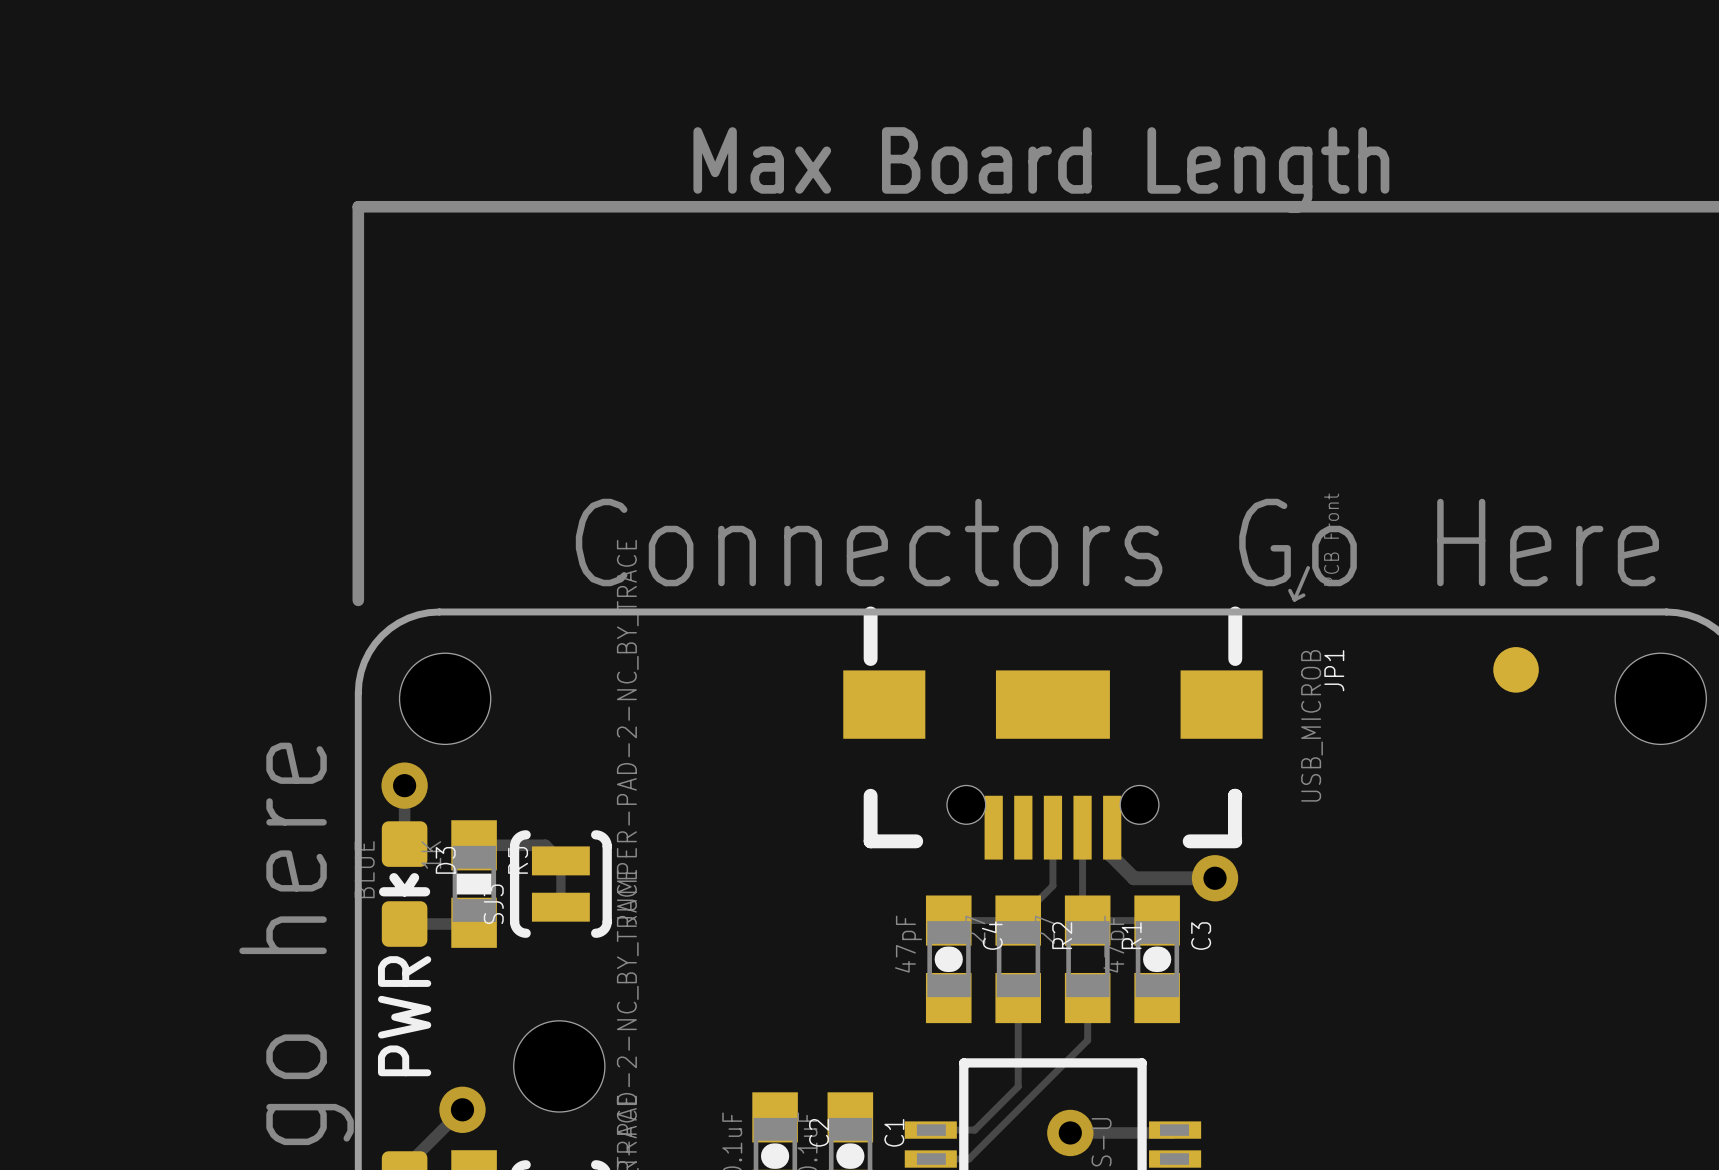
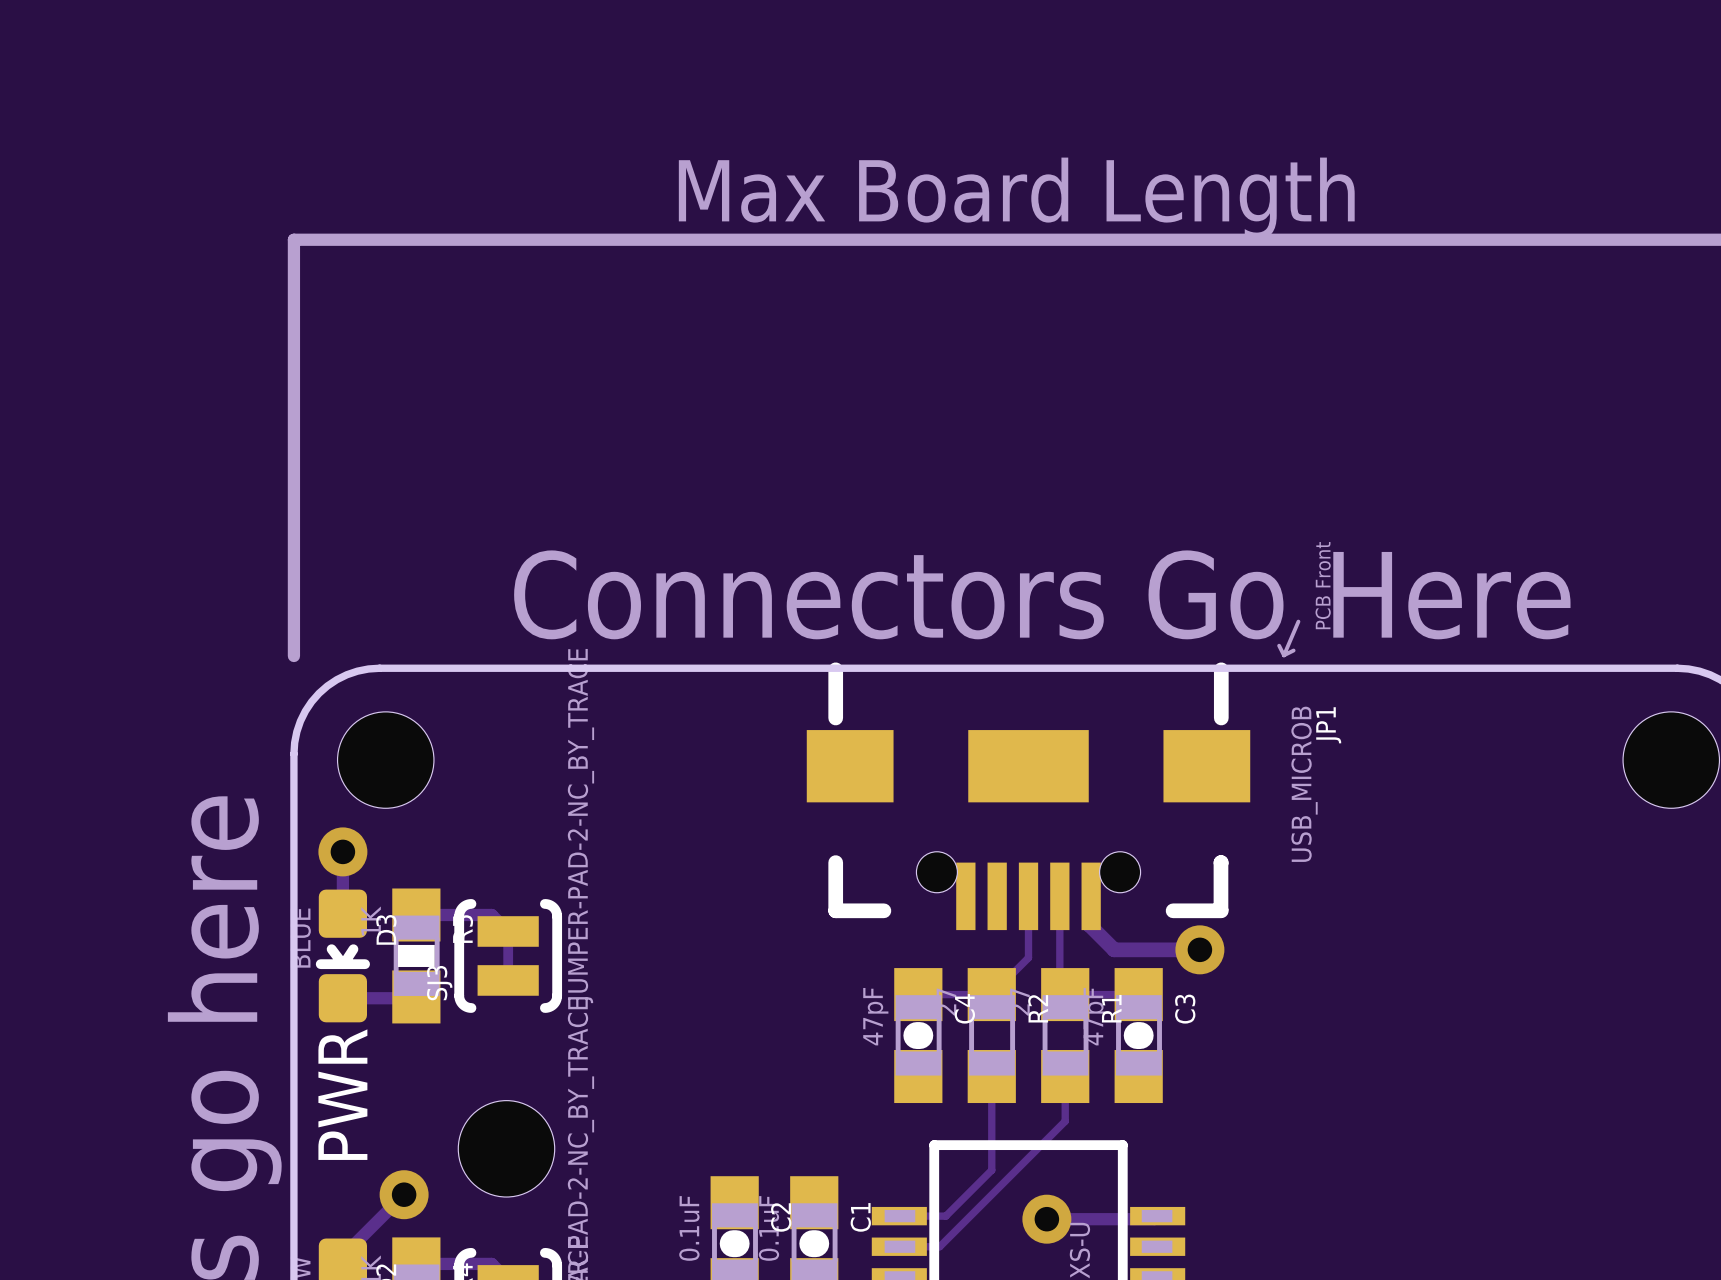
part: (1516, 669) -> none

